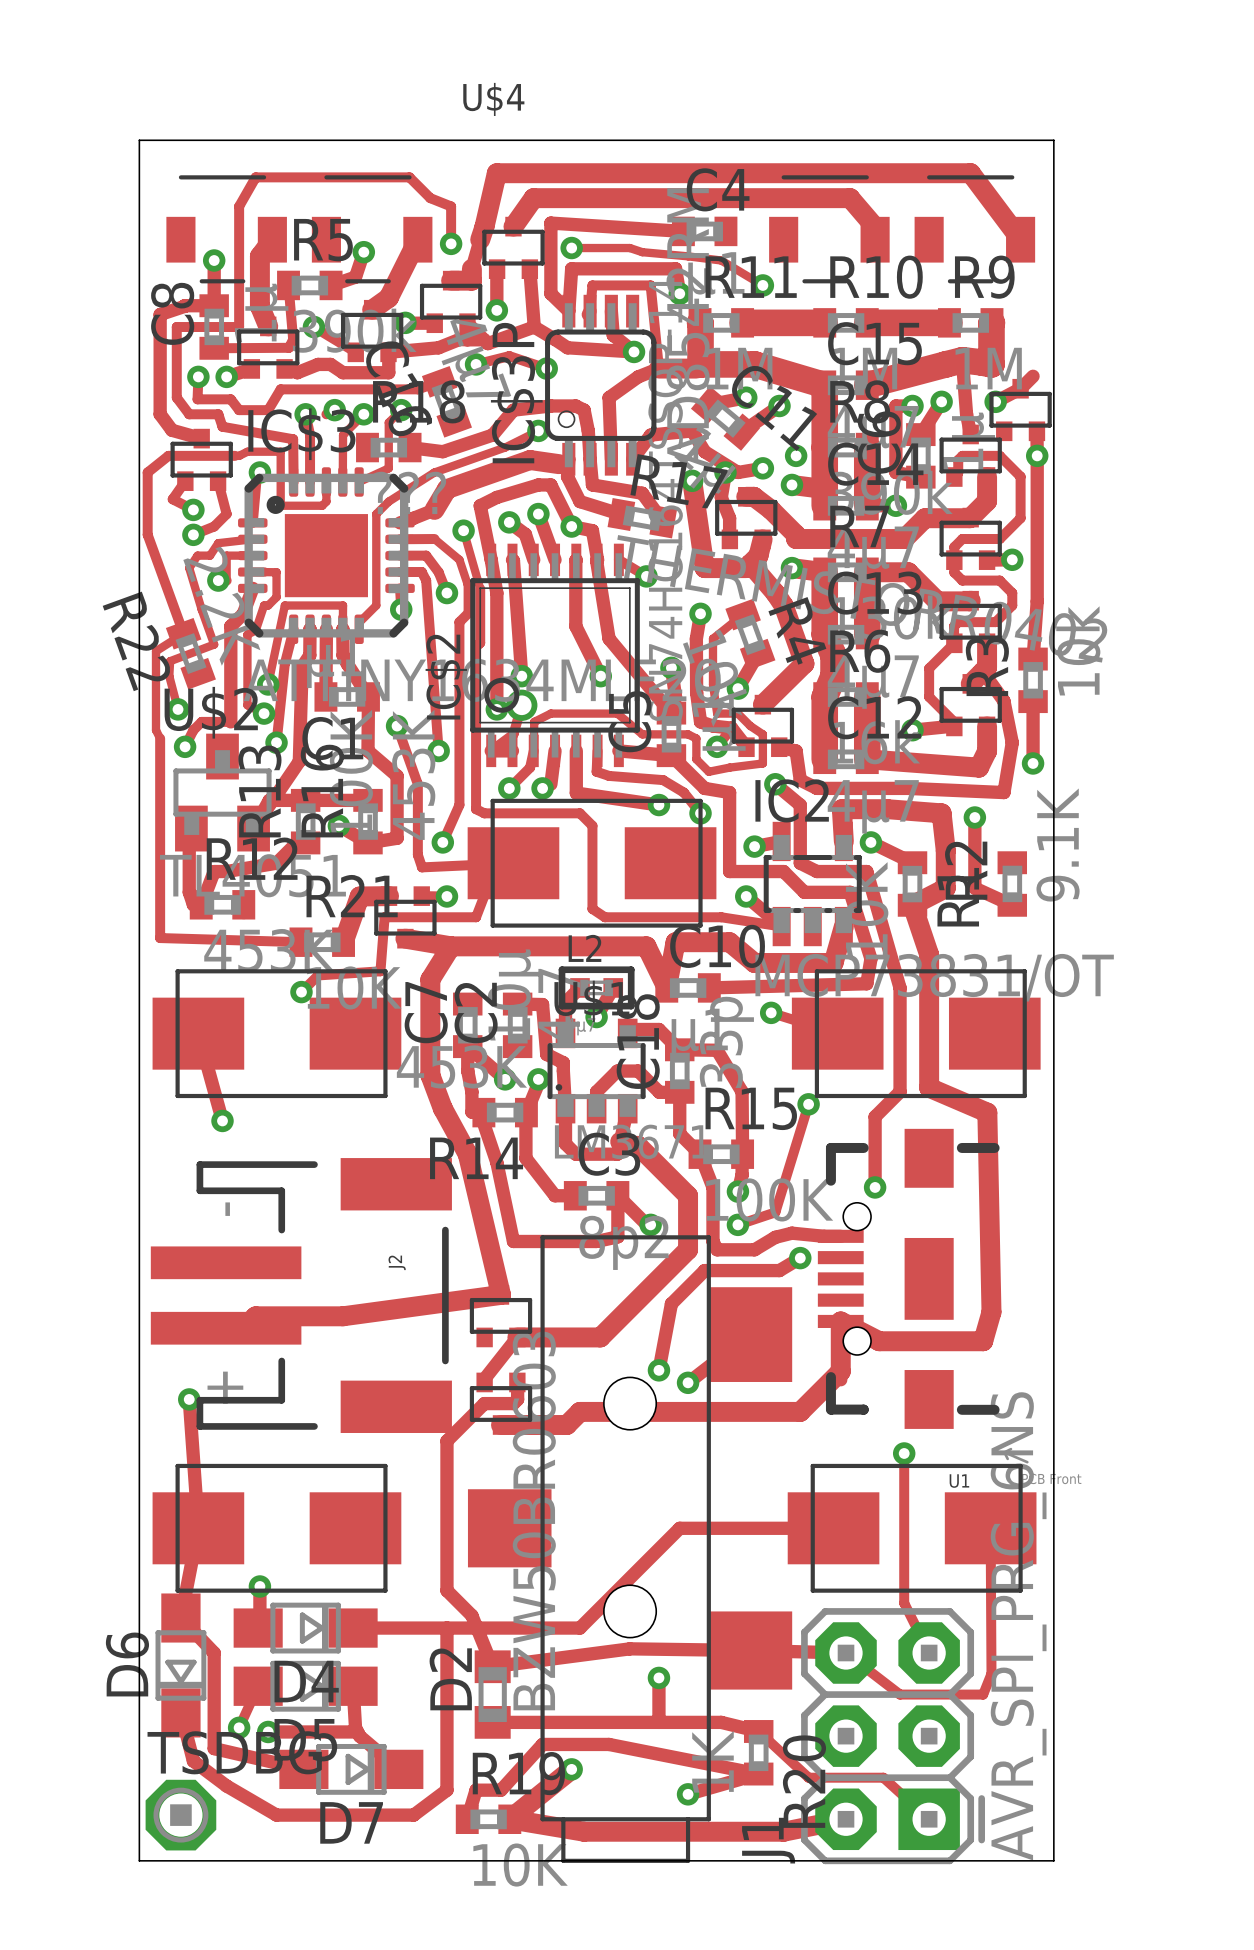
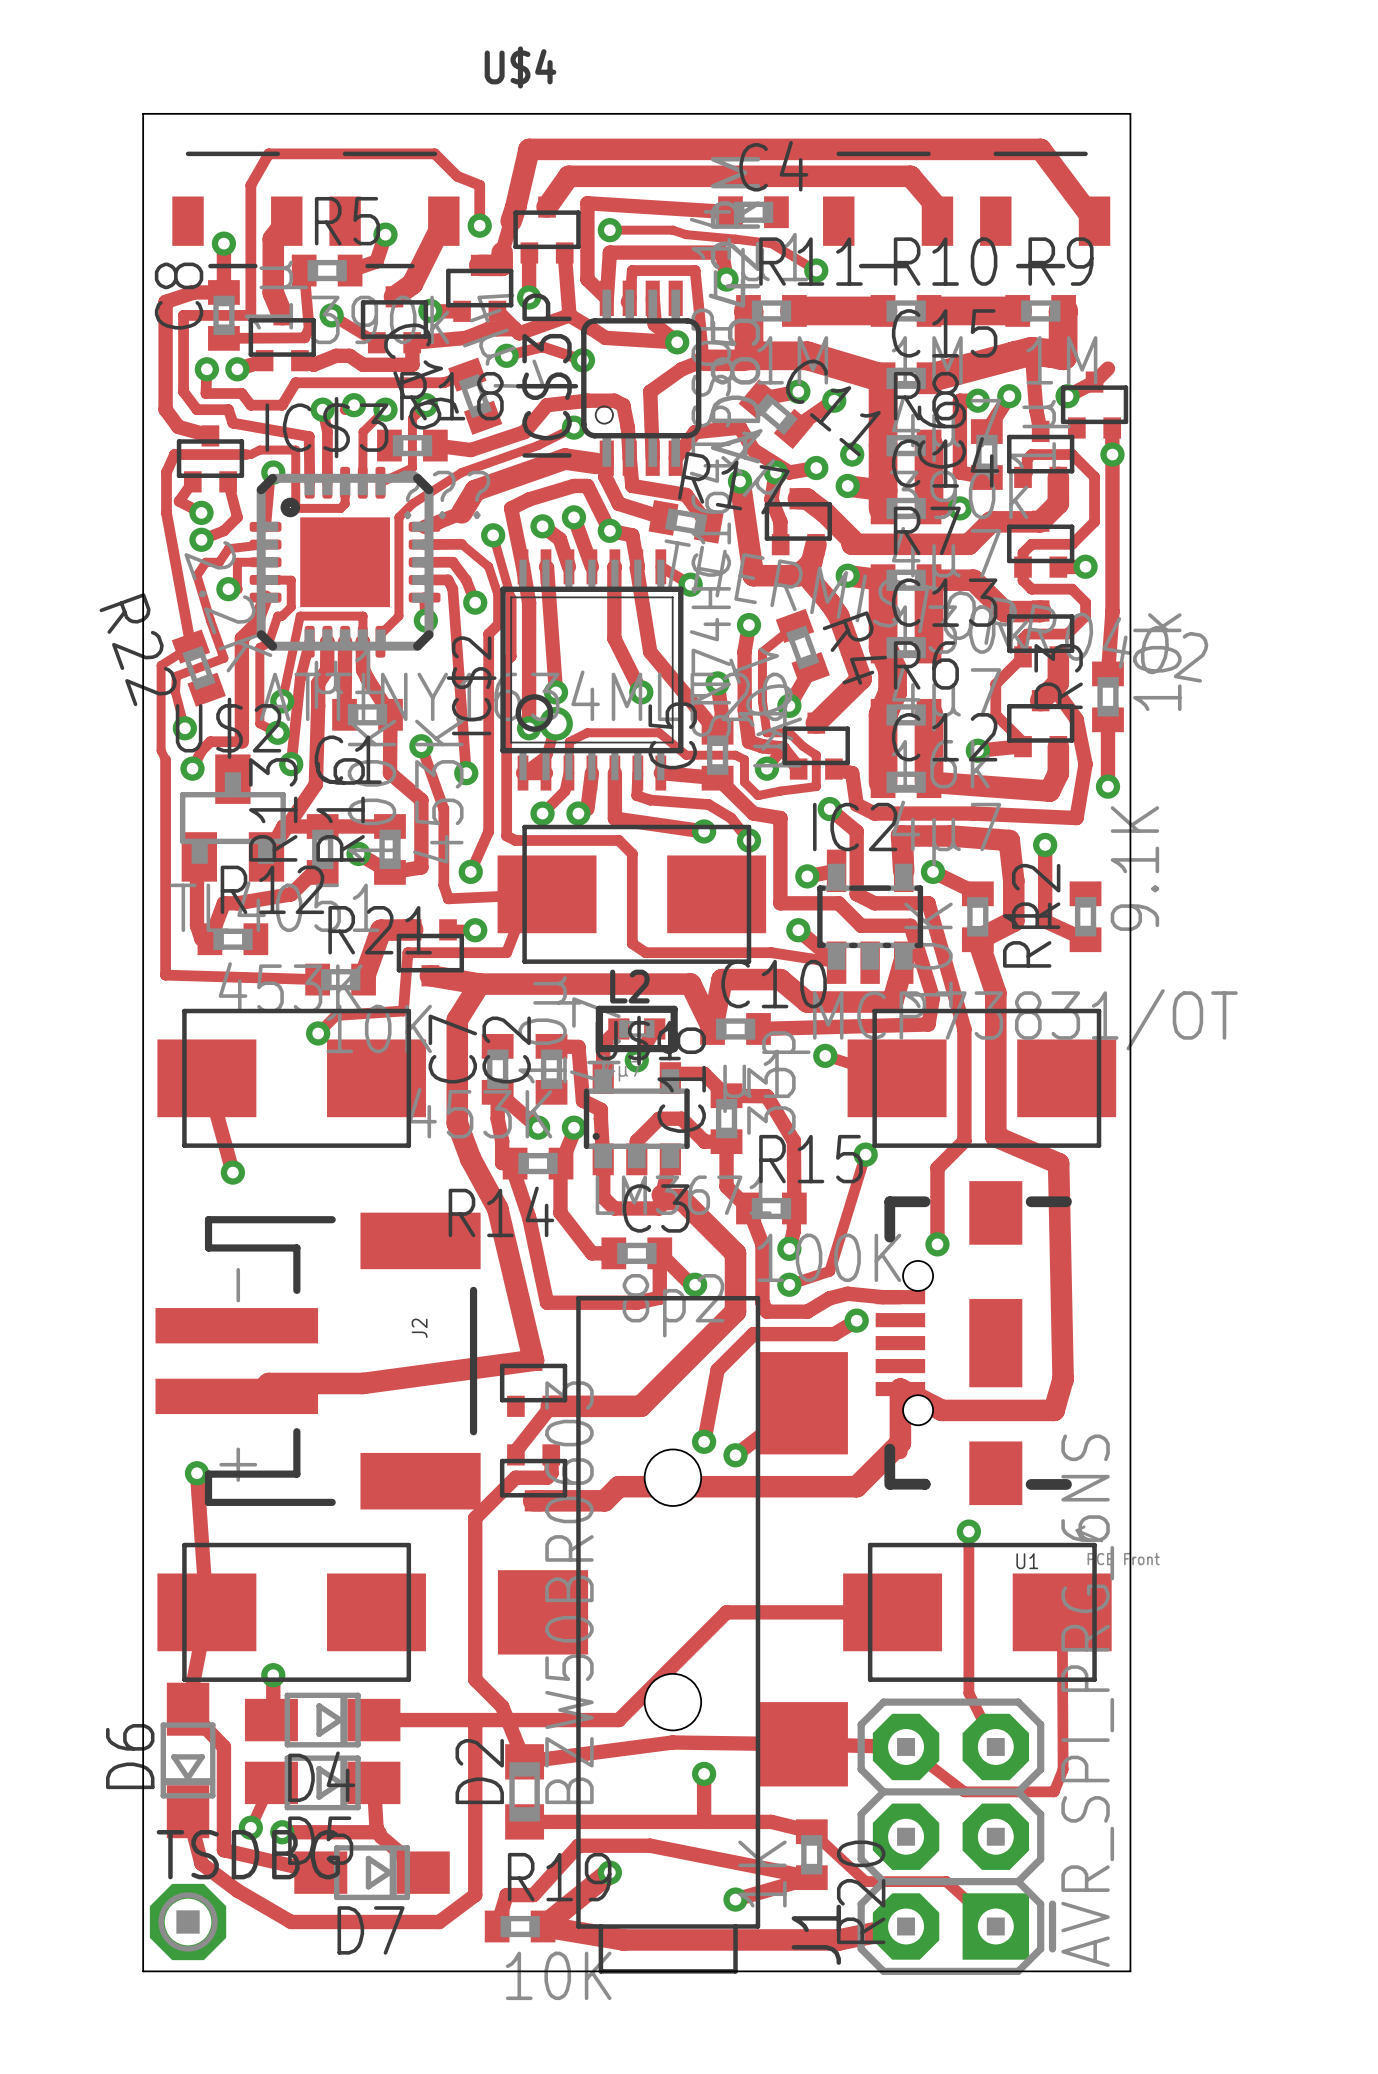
track: (168, 455) (147, 472) (147, 534) (183, 633) -> (174, 454) (166, 472) (166, 512) (190, 646)

